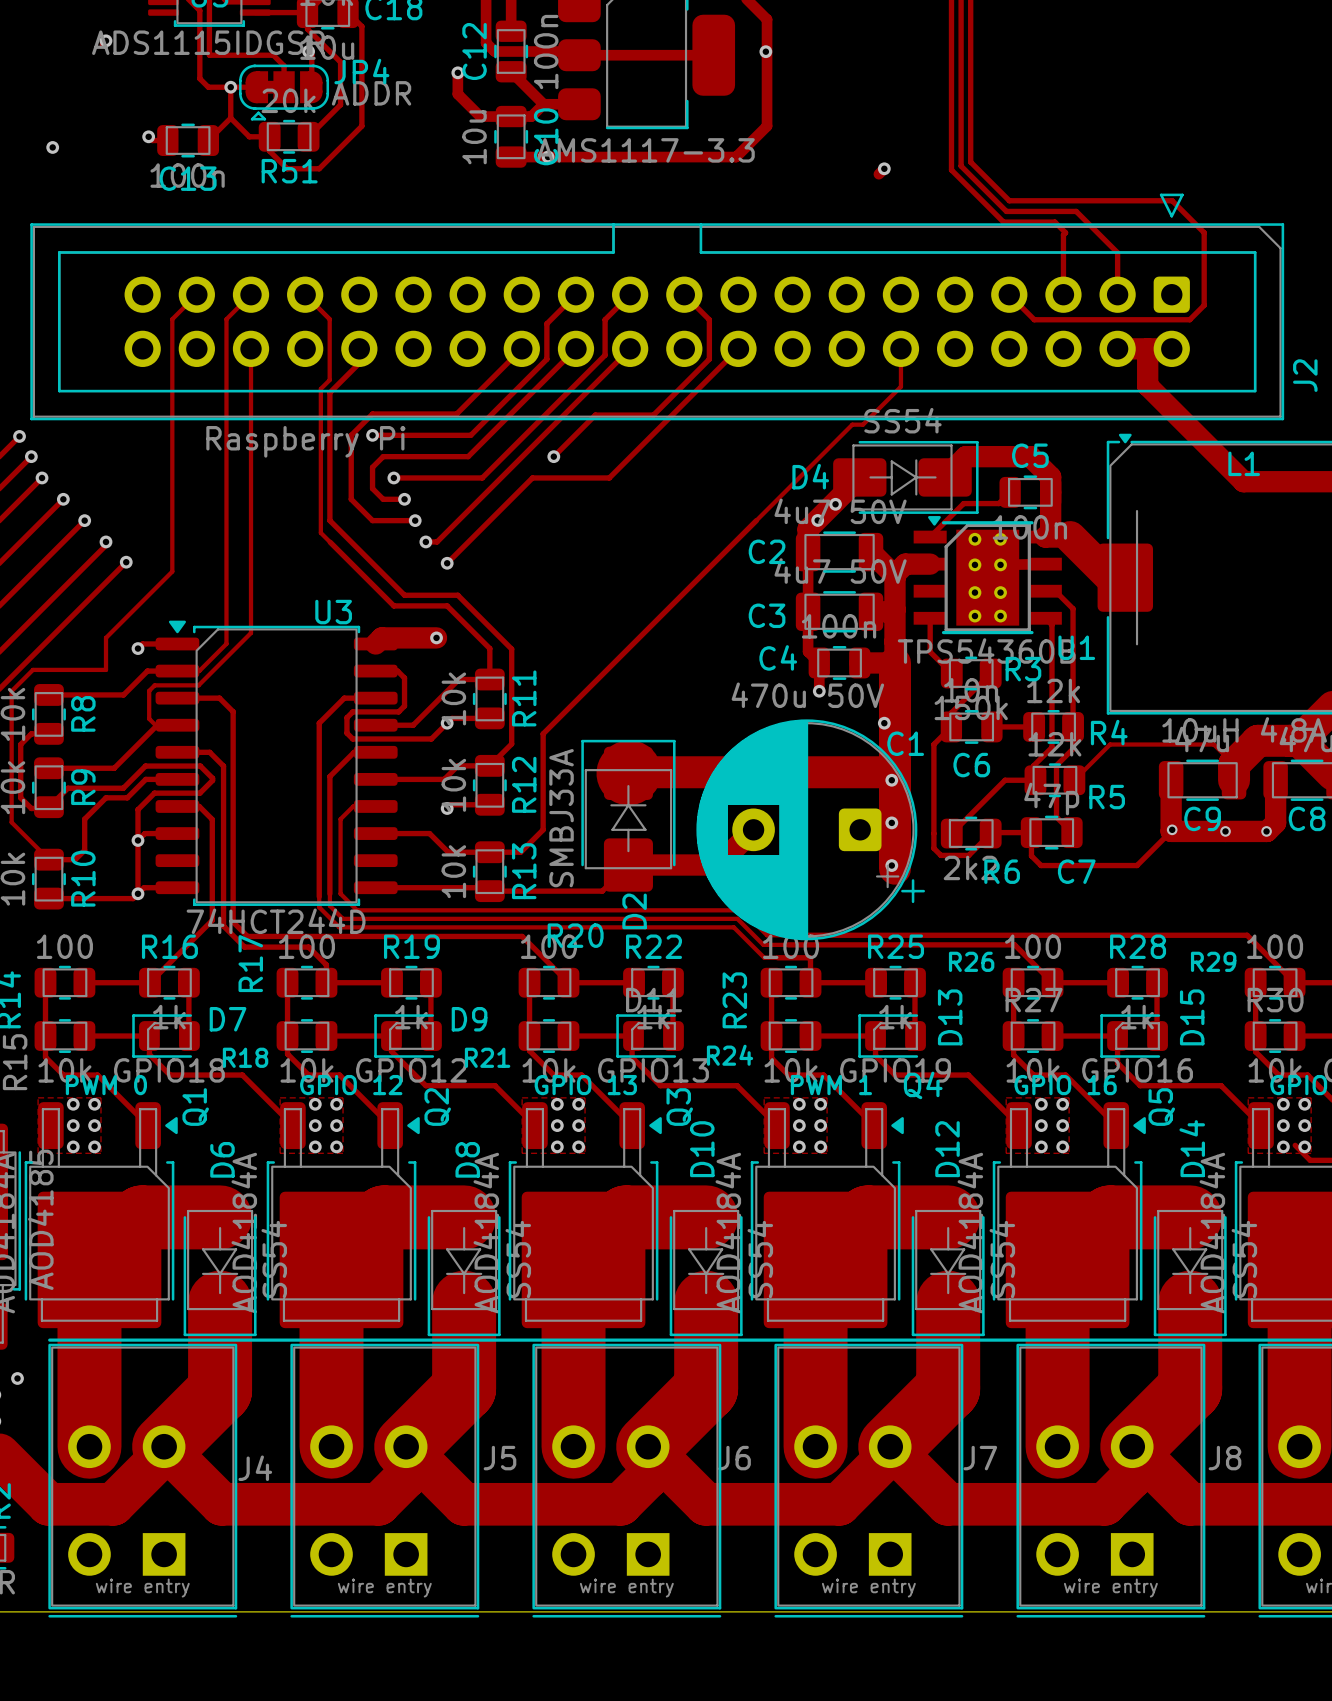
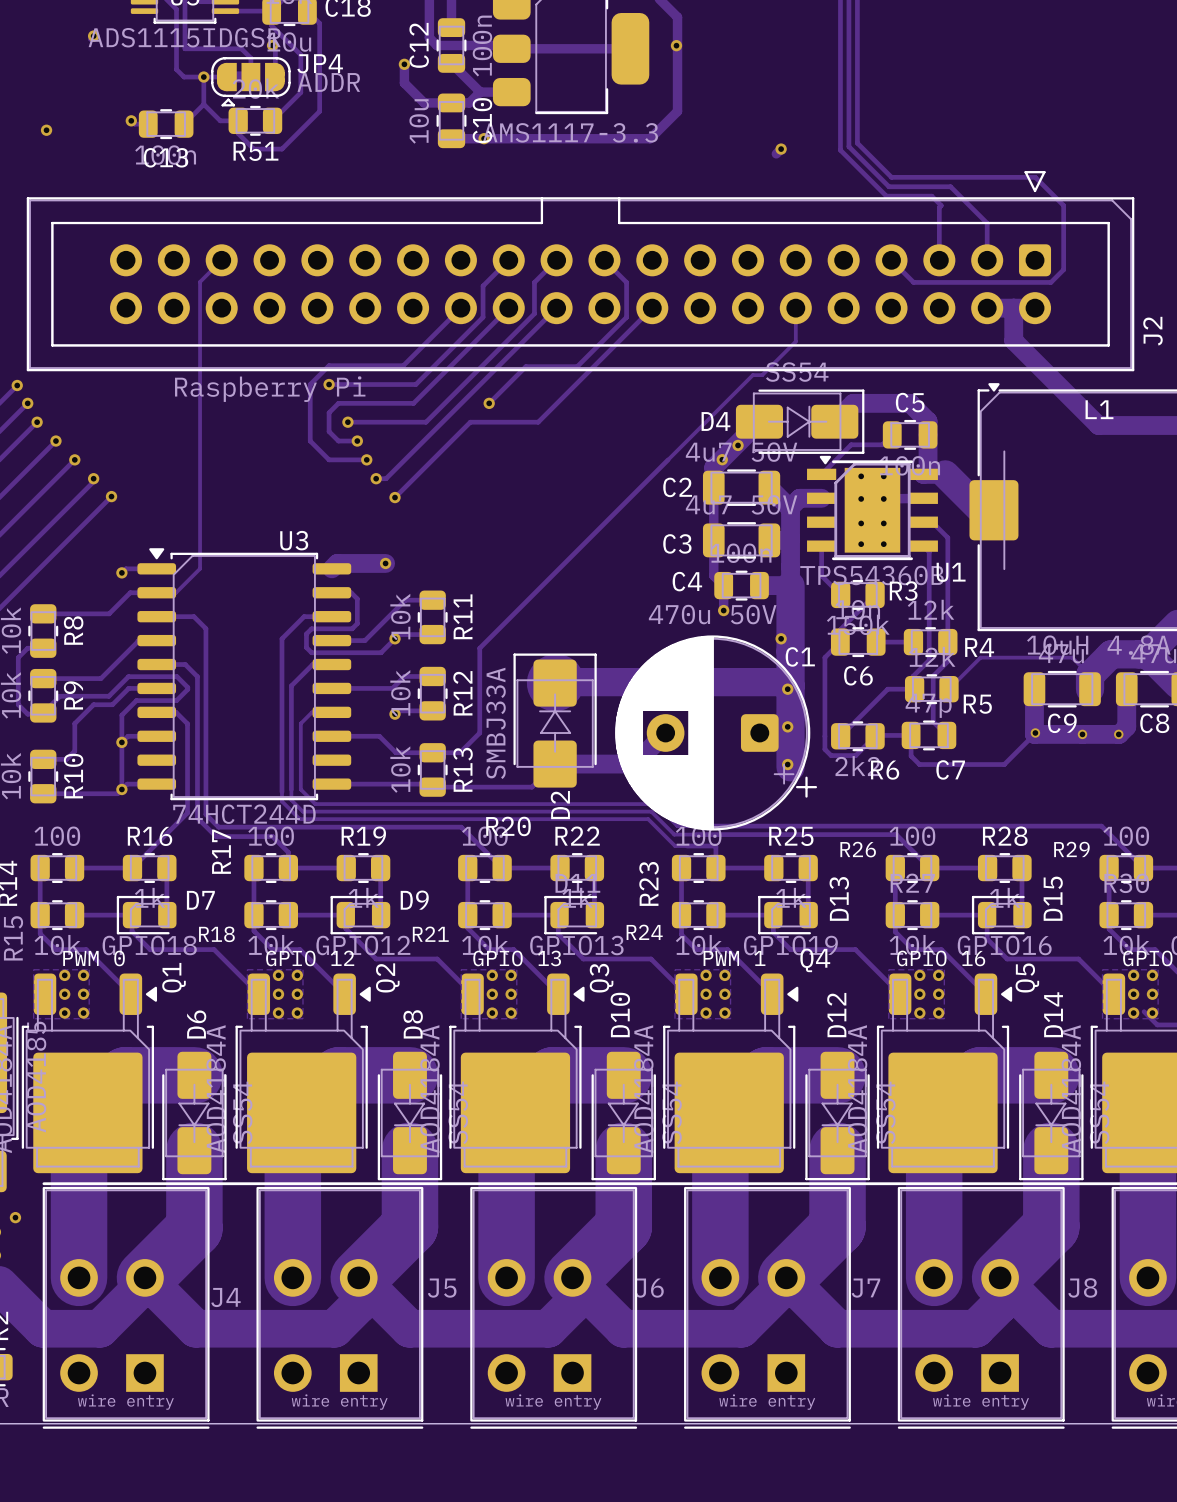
track: (196, 294) (172, 319) (172, 571) (106, 637) (106, 669) (32, 669) (11, 691) (11, 822) (48, 859) -> none
track: (305, 294) (329, 319) -> none
track: (329, 319) (329, 380) (320, 388) (320, 532) (393, 605) (447, 605) (489, 648) (489, 679) -> none
track: (251, 348) (251, 633) (198, 685) (154, 685) (149, 690) (149, 718) (155, 725) -> none
track: (359, 348) (359, 363) (329, 392) (329, 520) (404, 595) (457, 595) (511, 649) (511, 743) (489, 765) -> none

